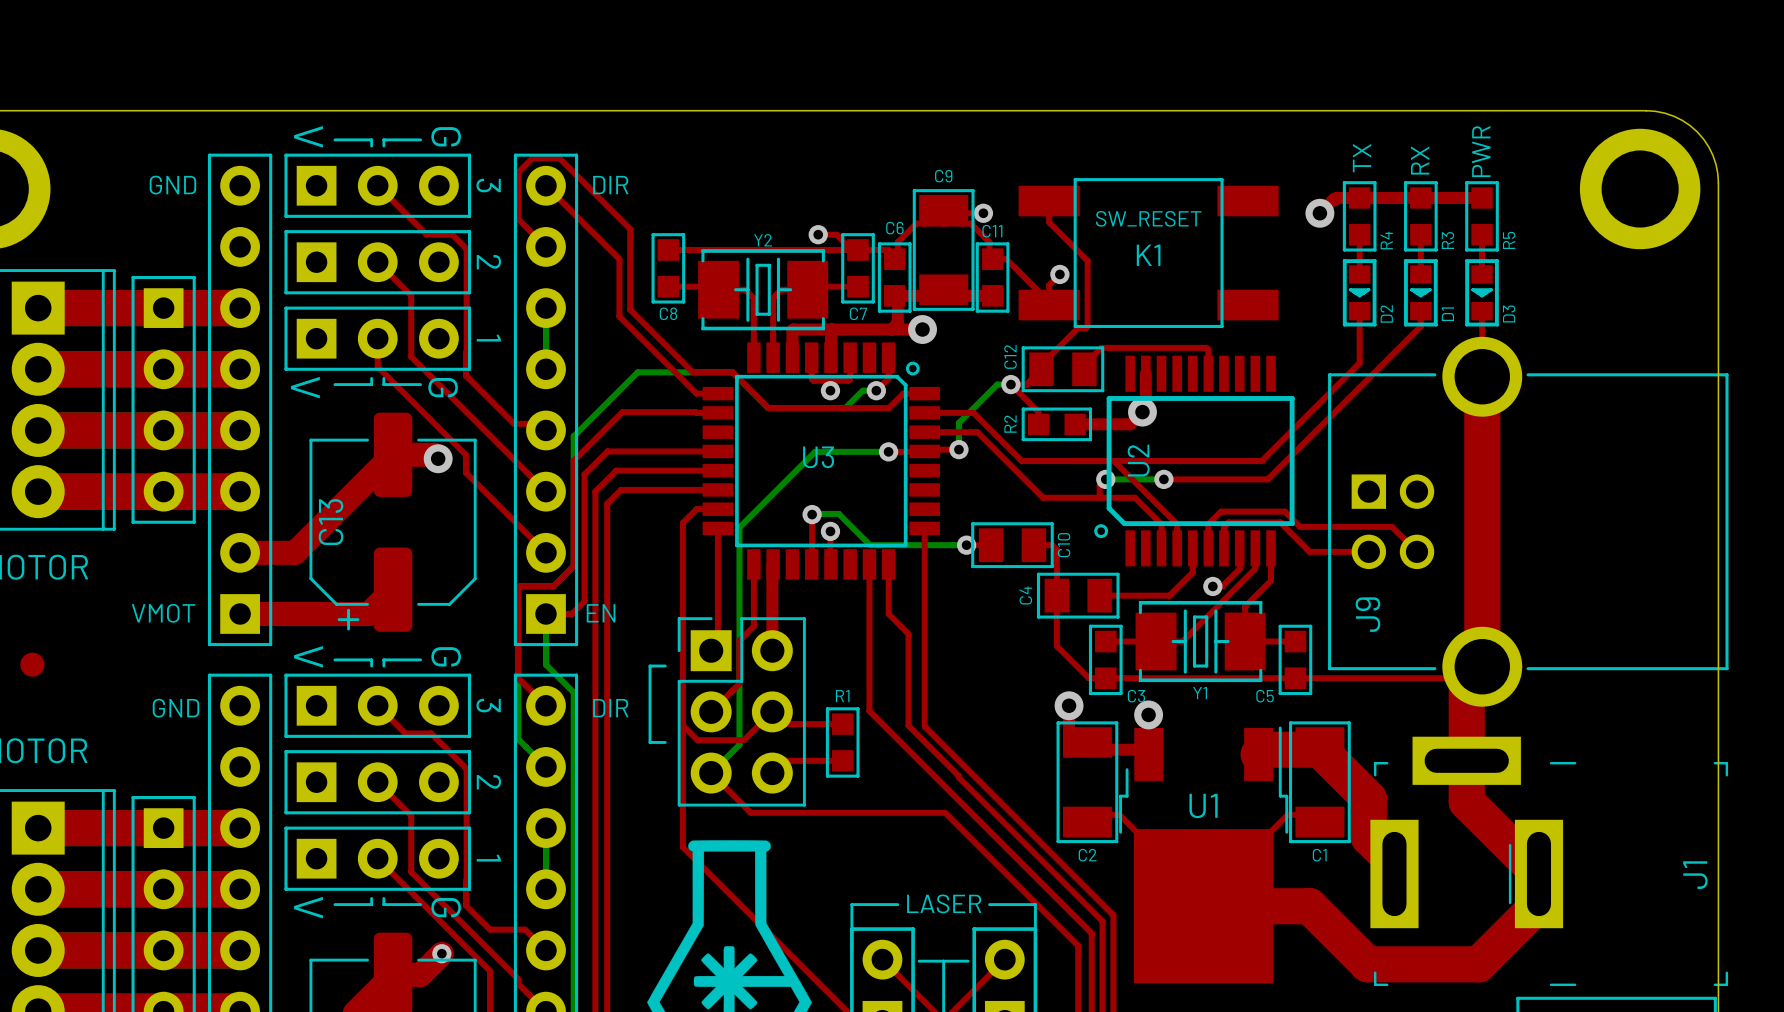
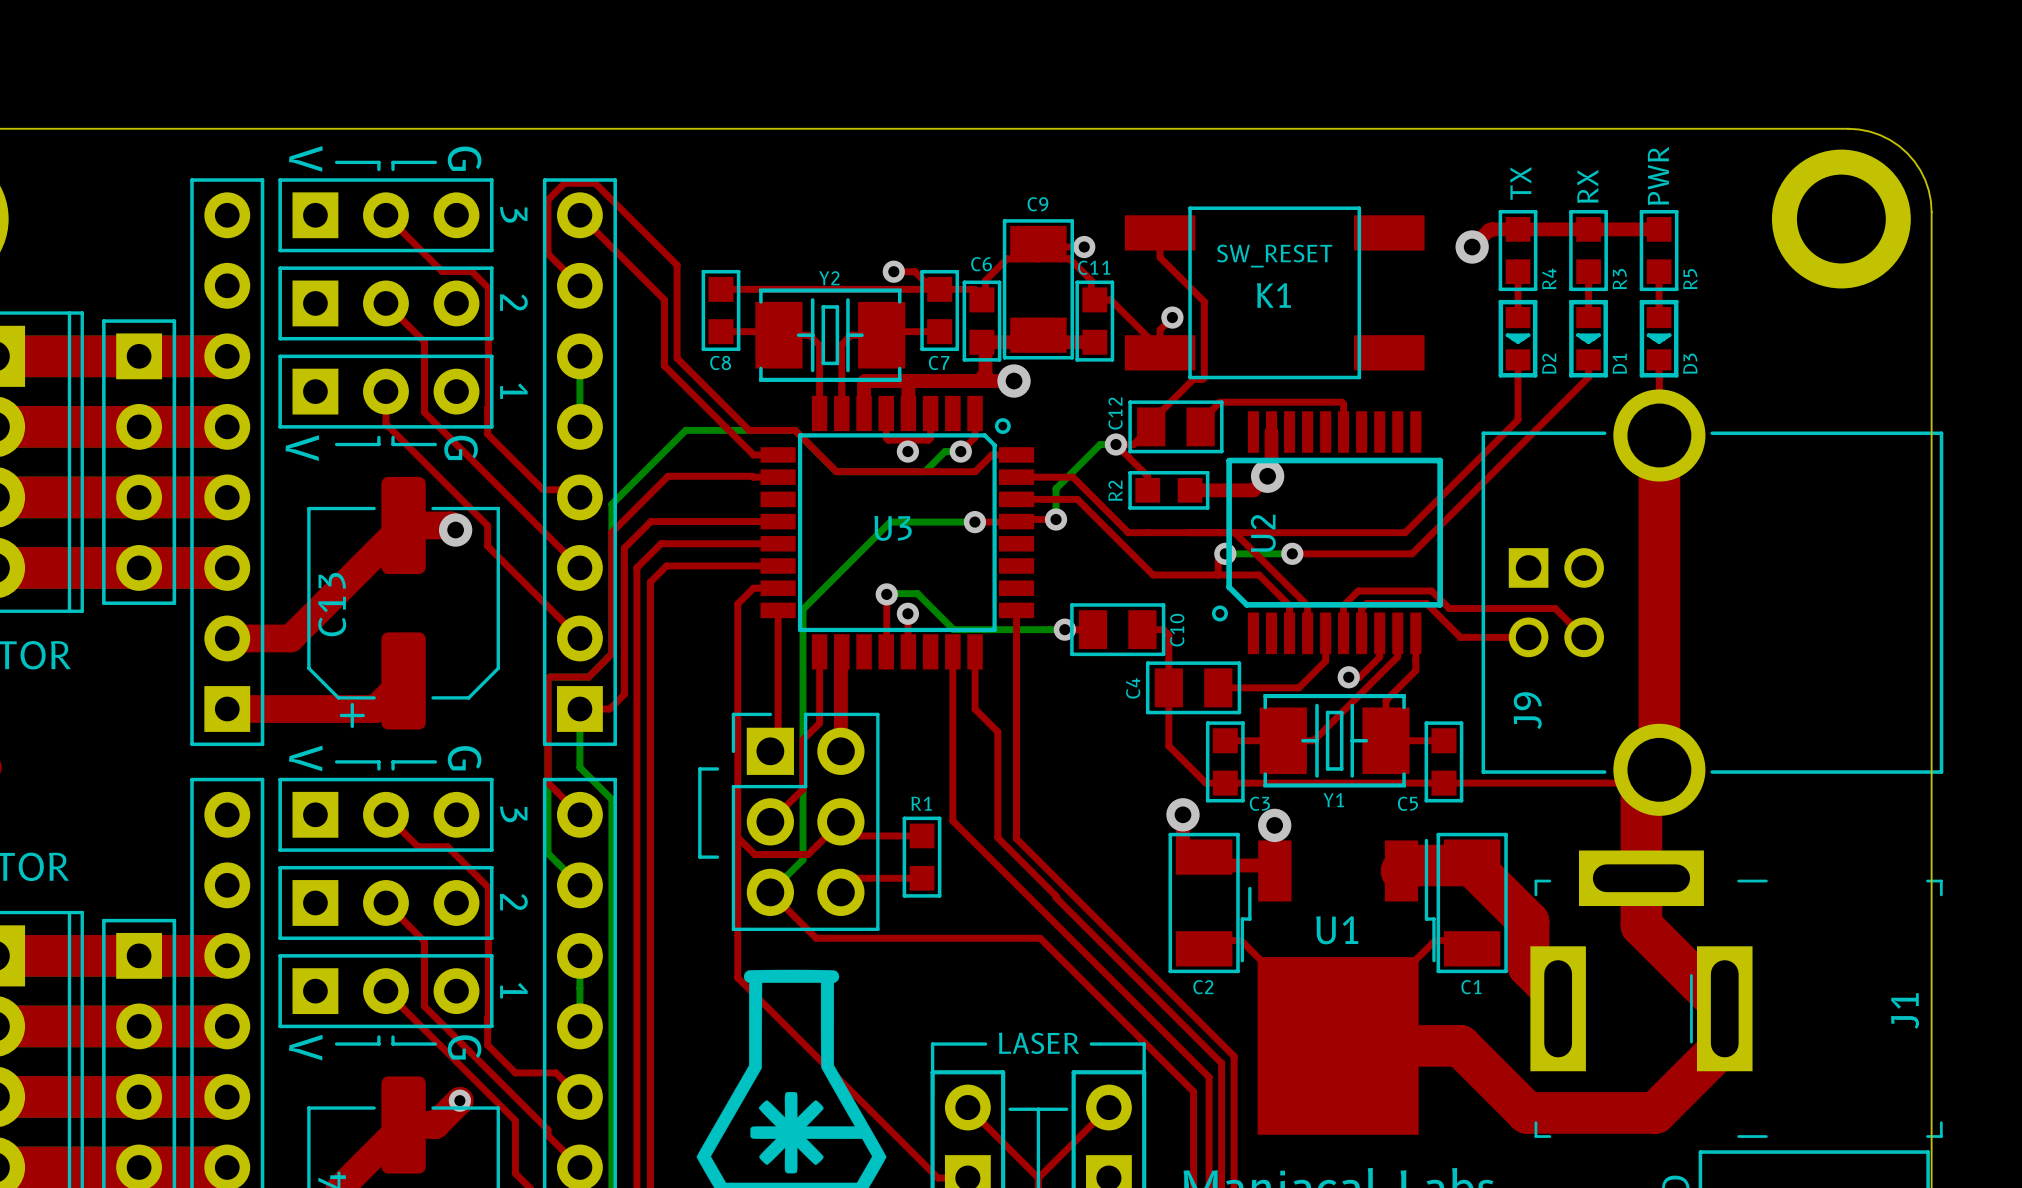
text: GND (172, 185) -> none
text: DIR (610, 185) -> none
text: VMOT (163, 613) -> none
text: EN (601, 613) -> none
text: GND (176, 708) -> none
text: DIR (610, 708) -> none

